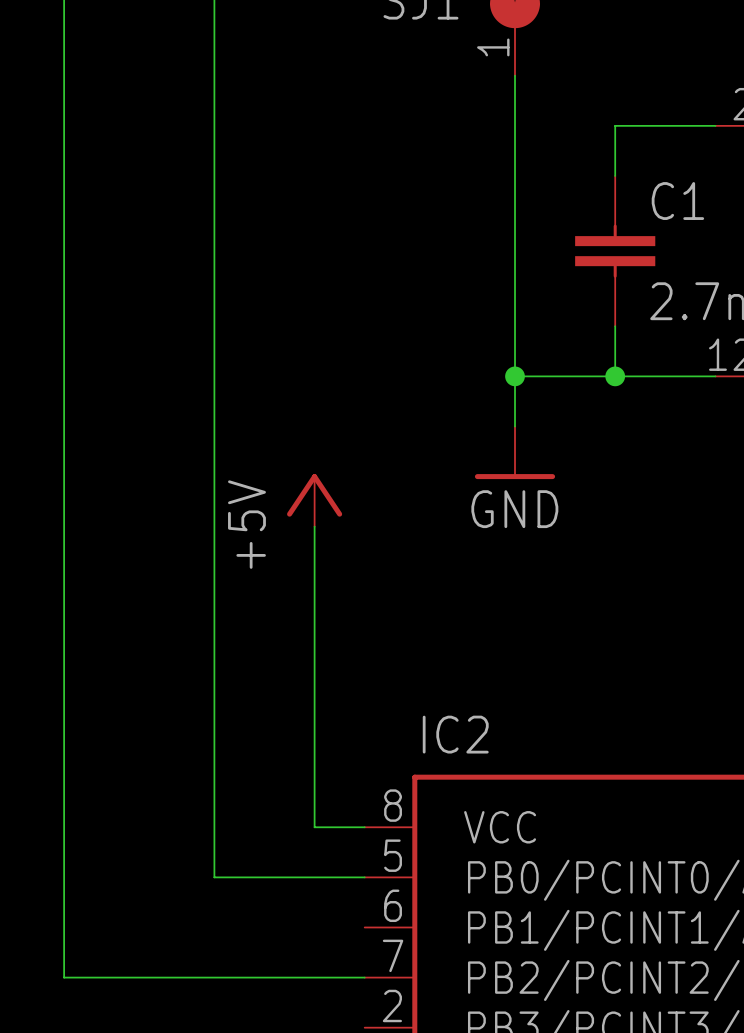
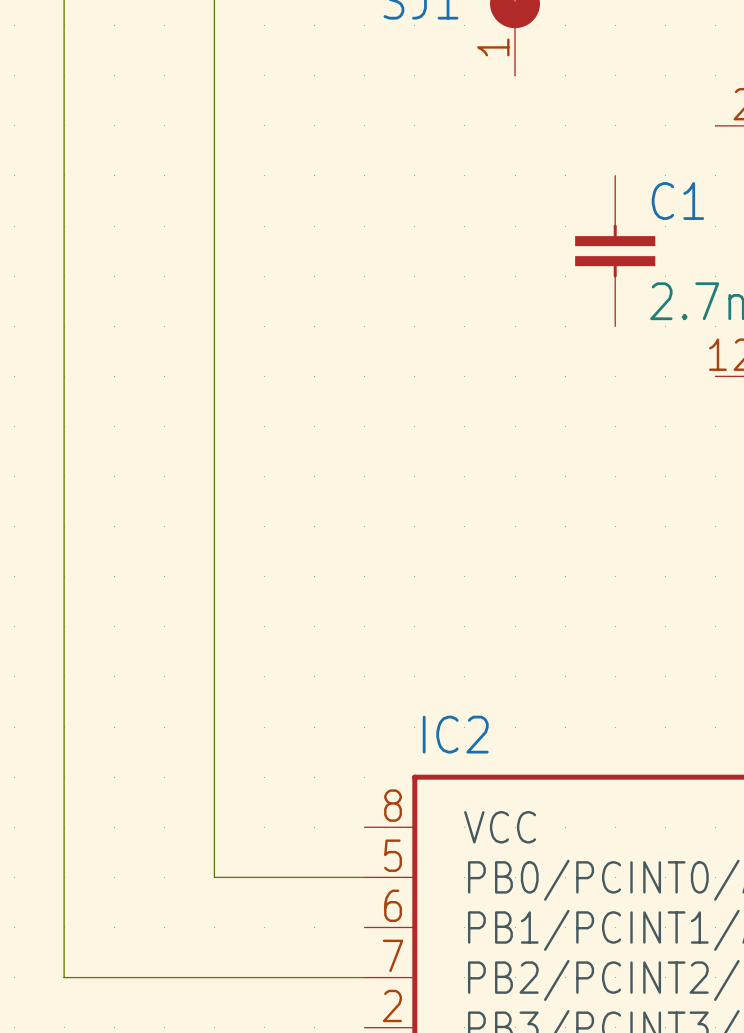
wire: (515, 75) (515, 426) -> none
wire: (715, 125) (615, 125) (615, 175) -> none
wire: (615, 326) (615, 376) -> none
wire: (515, 376) (715, 376) -> none
junction: (515, 376) -> none
junction: (615, 376) -> none
power symbol: GND (515, 452) -> none
power symbol: +5V (314, 500) -> none
wire: (314, 526) (314, 827) (364, 827) -> none

